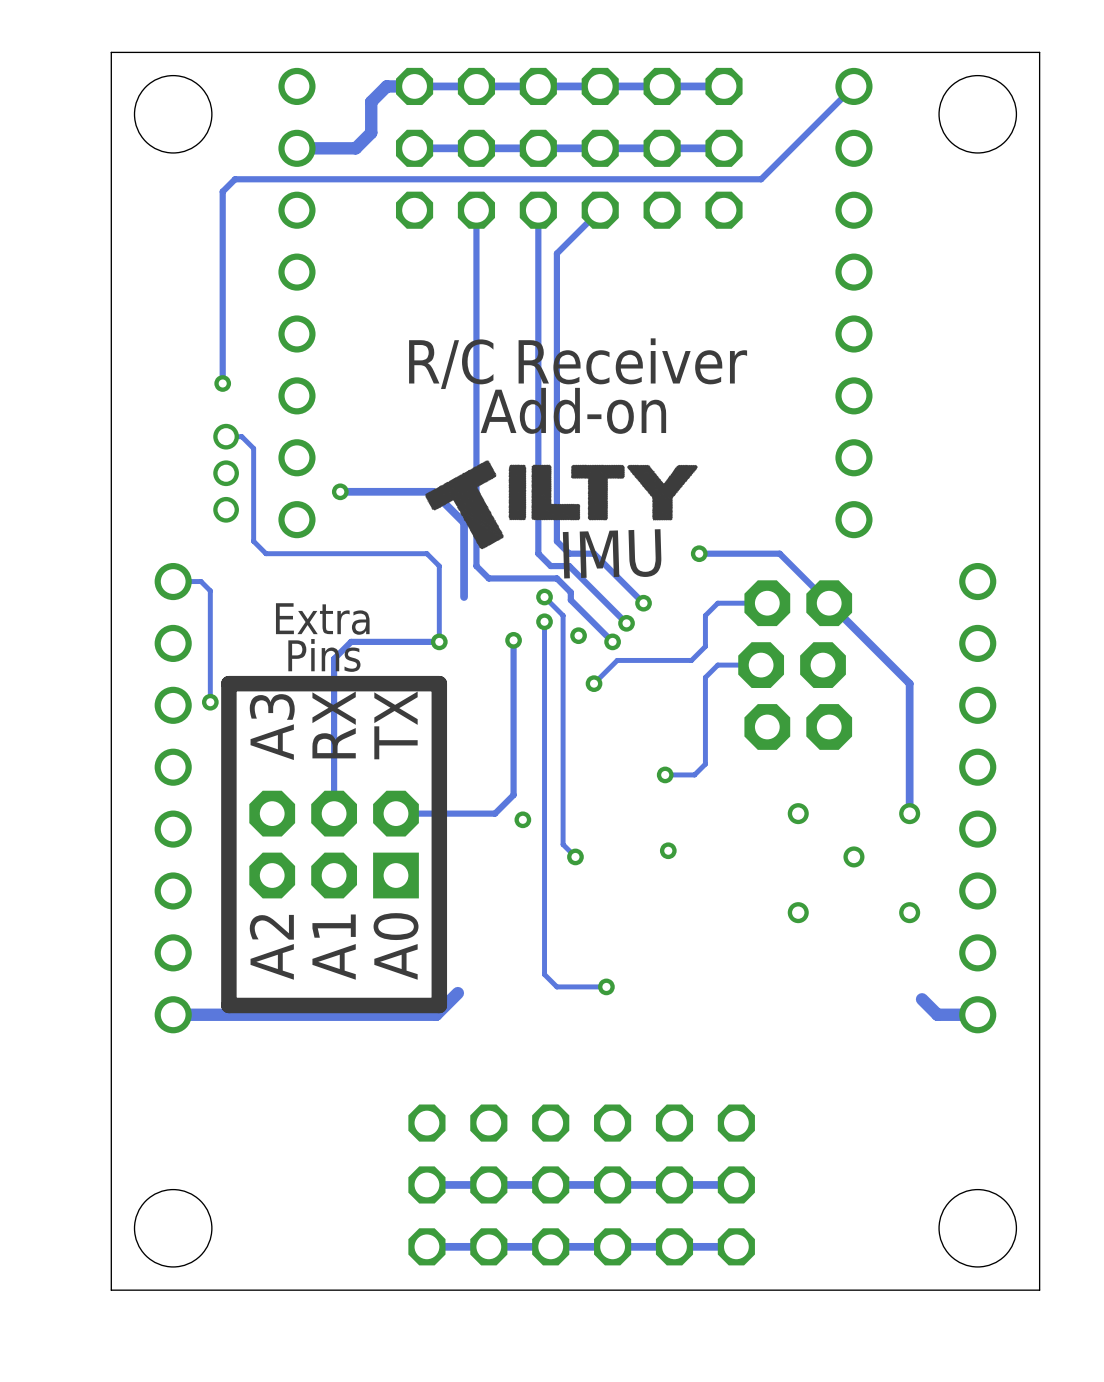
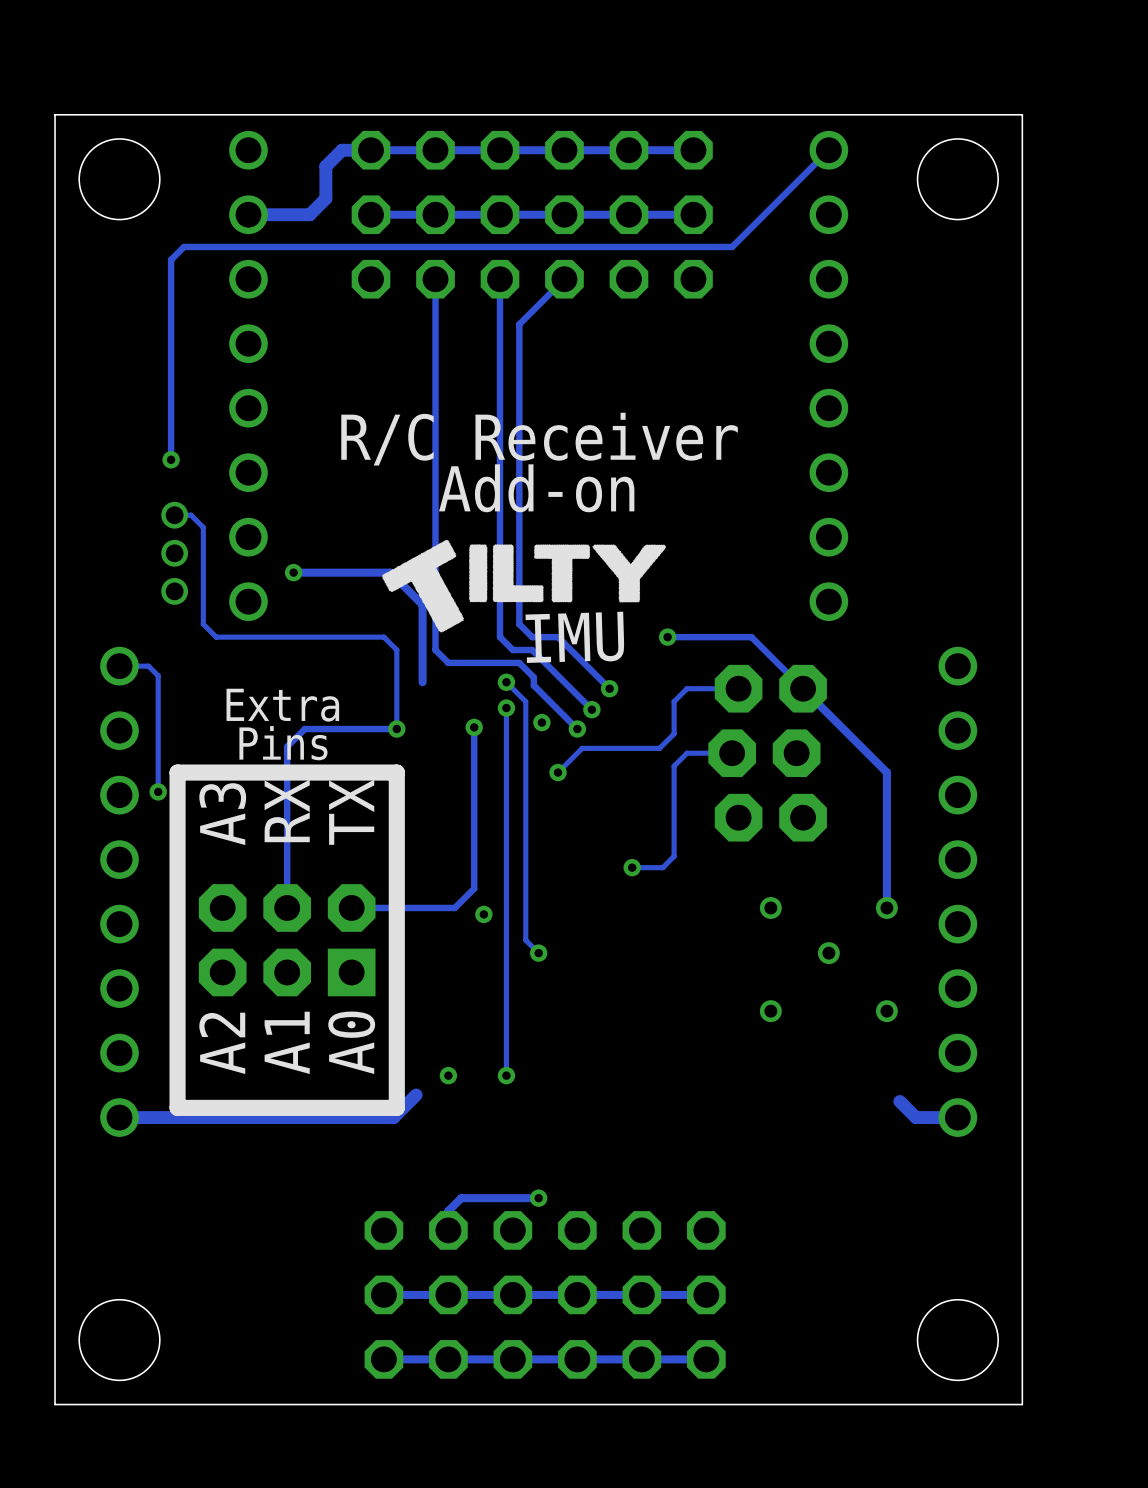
via: (668, 850) -> none
via: none -> (448, 1075)
track: (544, 974) (556, 986) (606, 986) -> none
via: none -> (506, 1075)
via: (606, 986) -> none
track: none -> (538, 1198) (461, 1198) (448, 1211) (448, 1230)
via: none -> (538, 1198)

